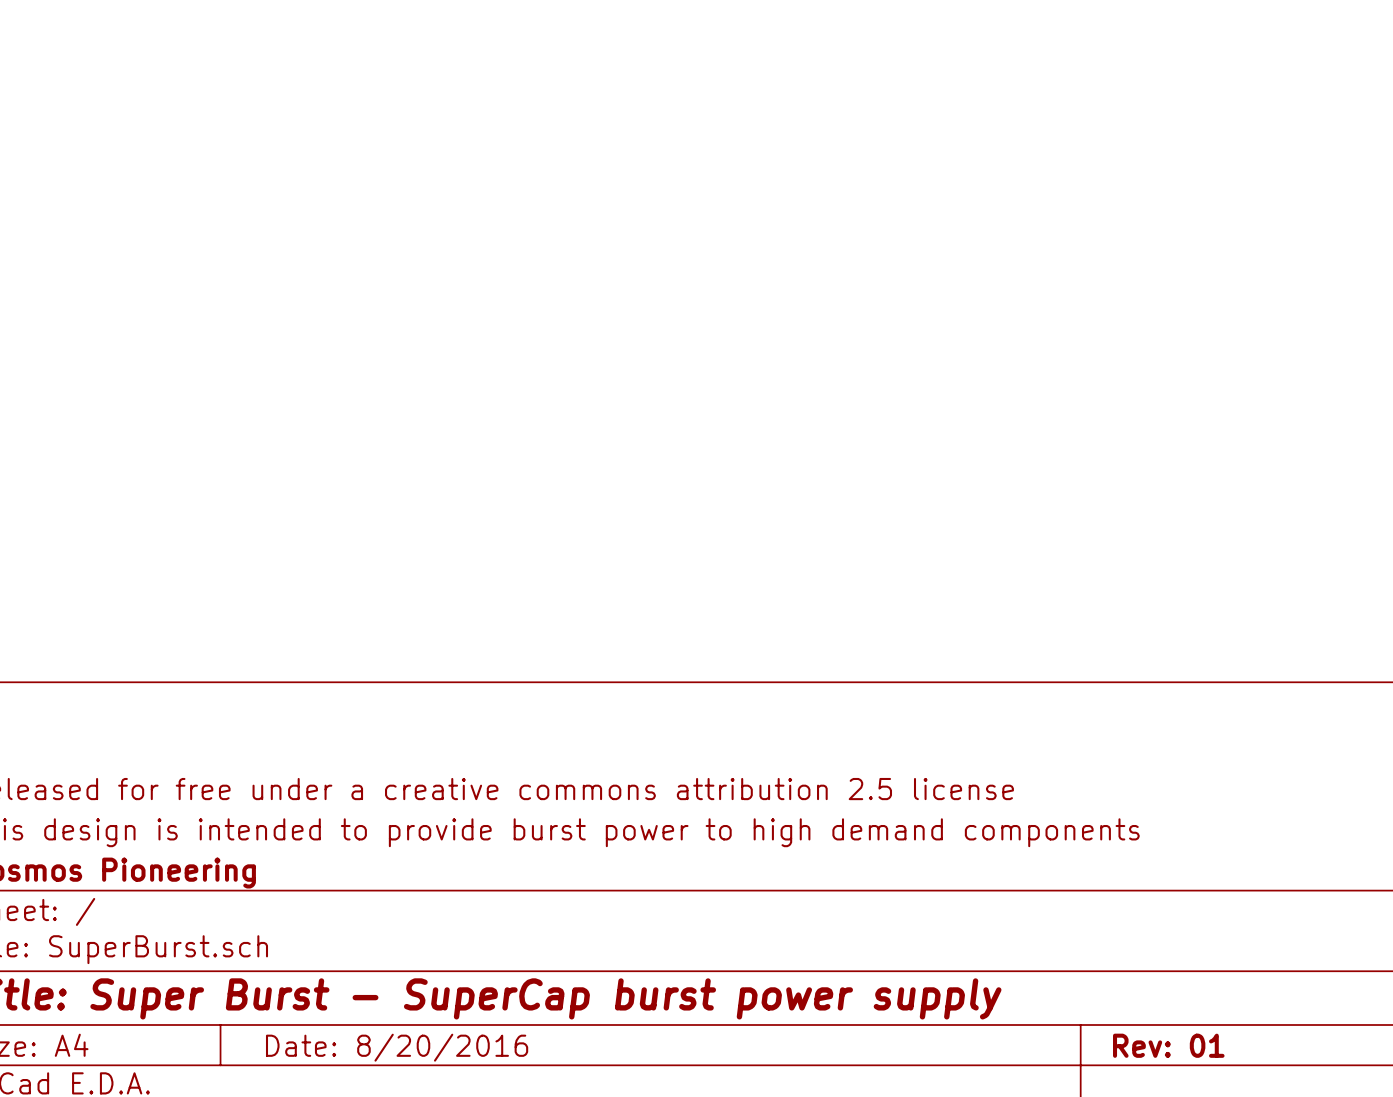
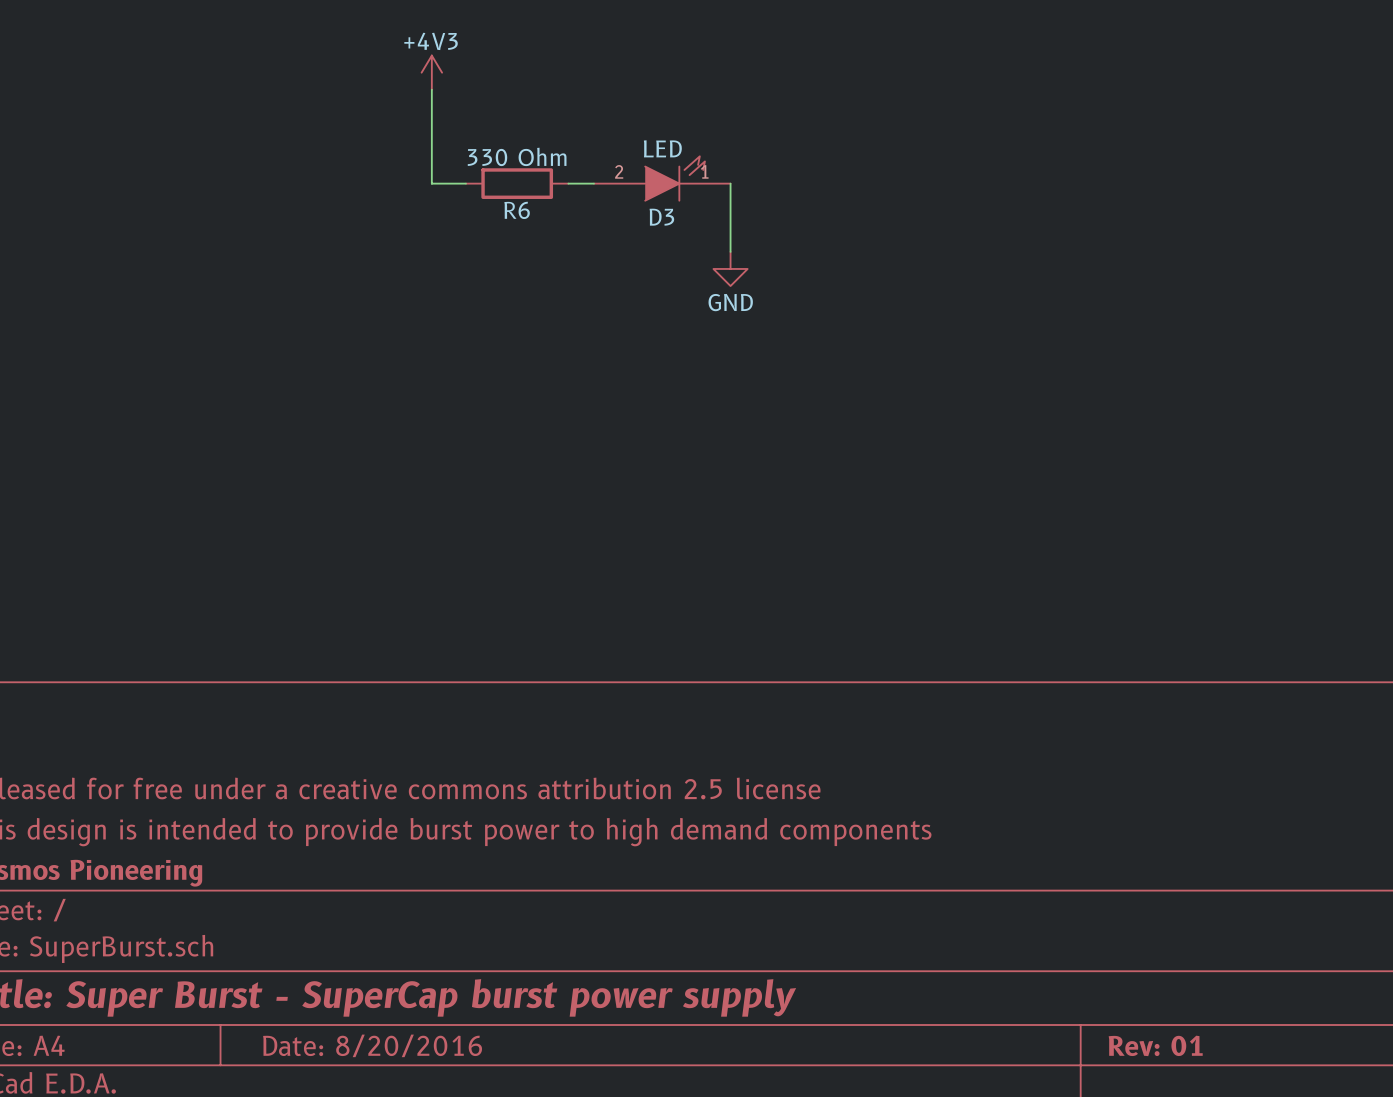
power symbol: none -> +4V3 (431, 72)
wire: none -> (431, 89) (431, 183) (465, 183)
D3: none -> LED (662, 178)
R6: none -> 330 Ohm (517, 183)
wire: none -> (568, 183) (594, 183)
wire: none -> (730, 183) (730, 251)
power symbol: none -> GND (730, 268)

